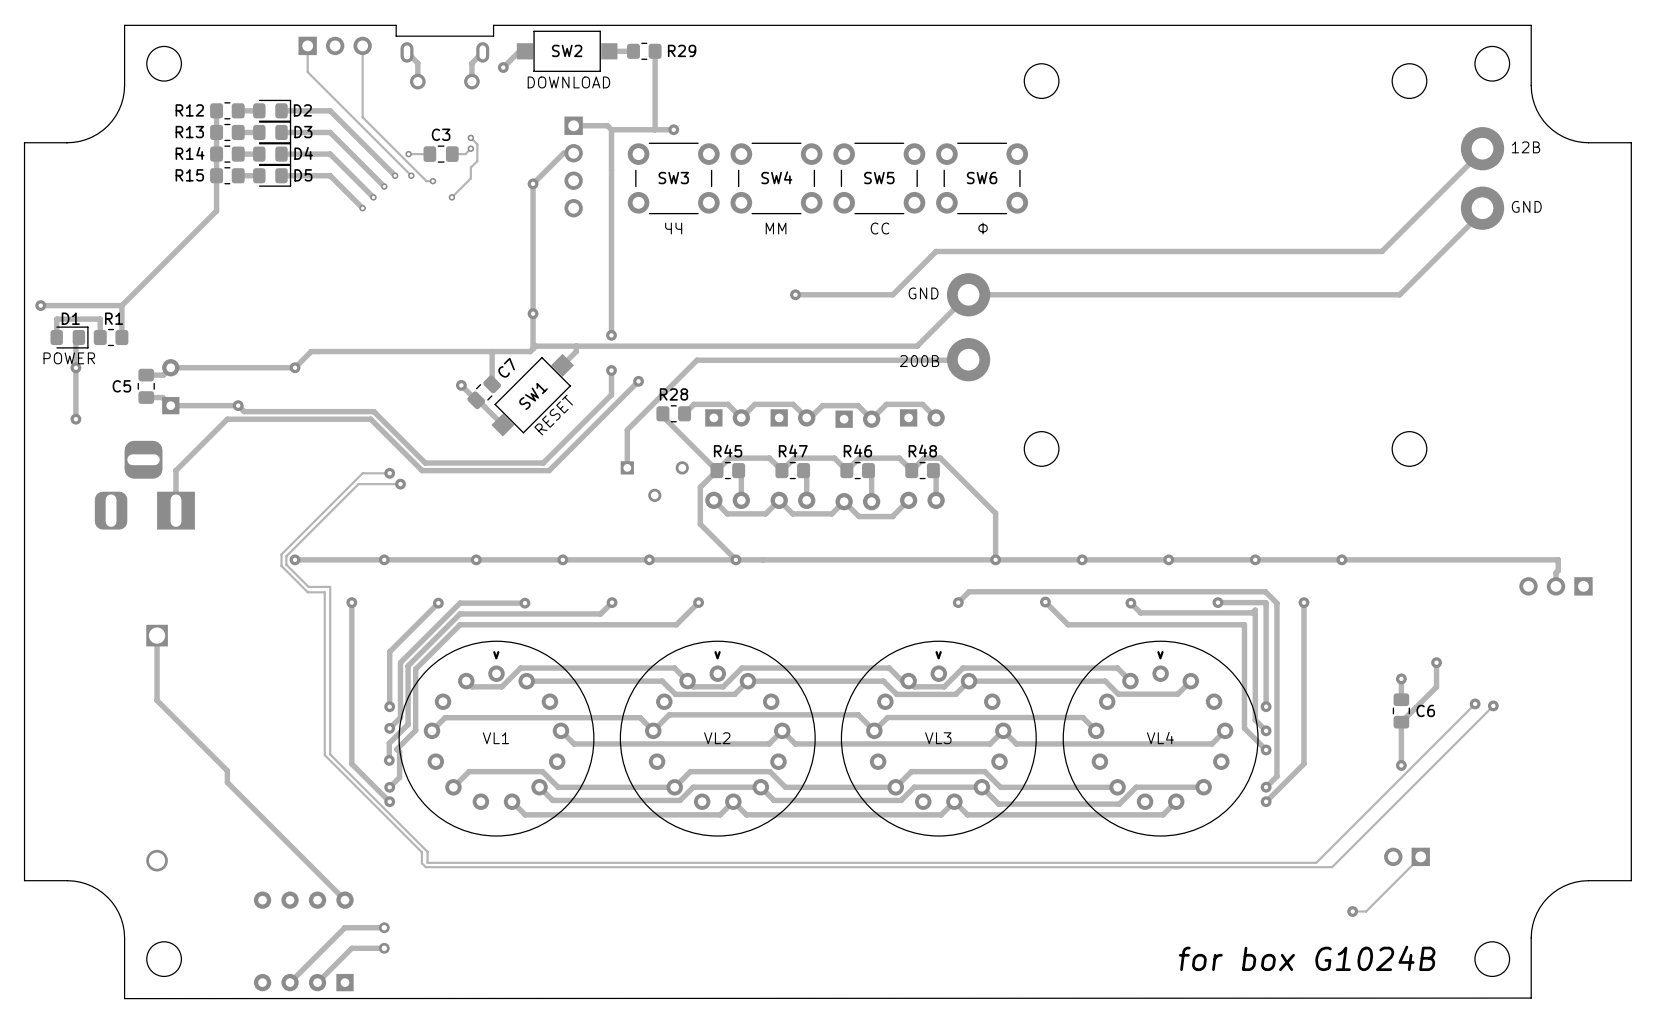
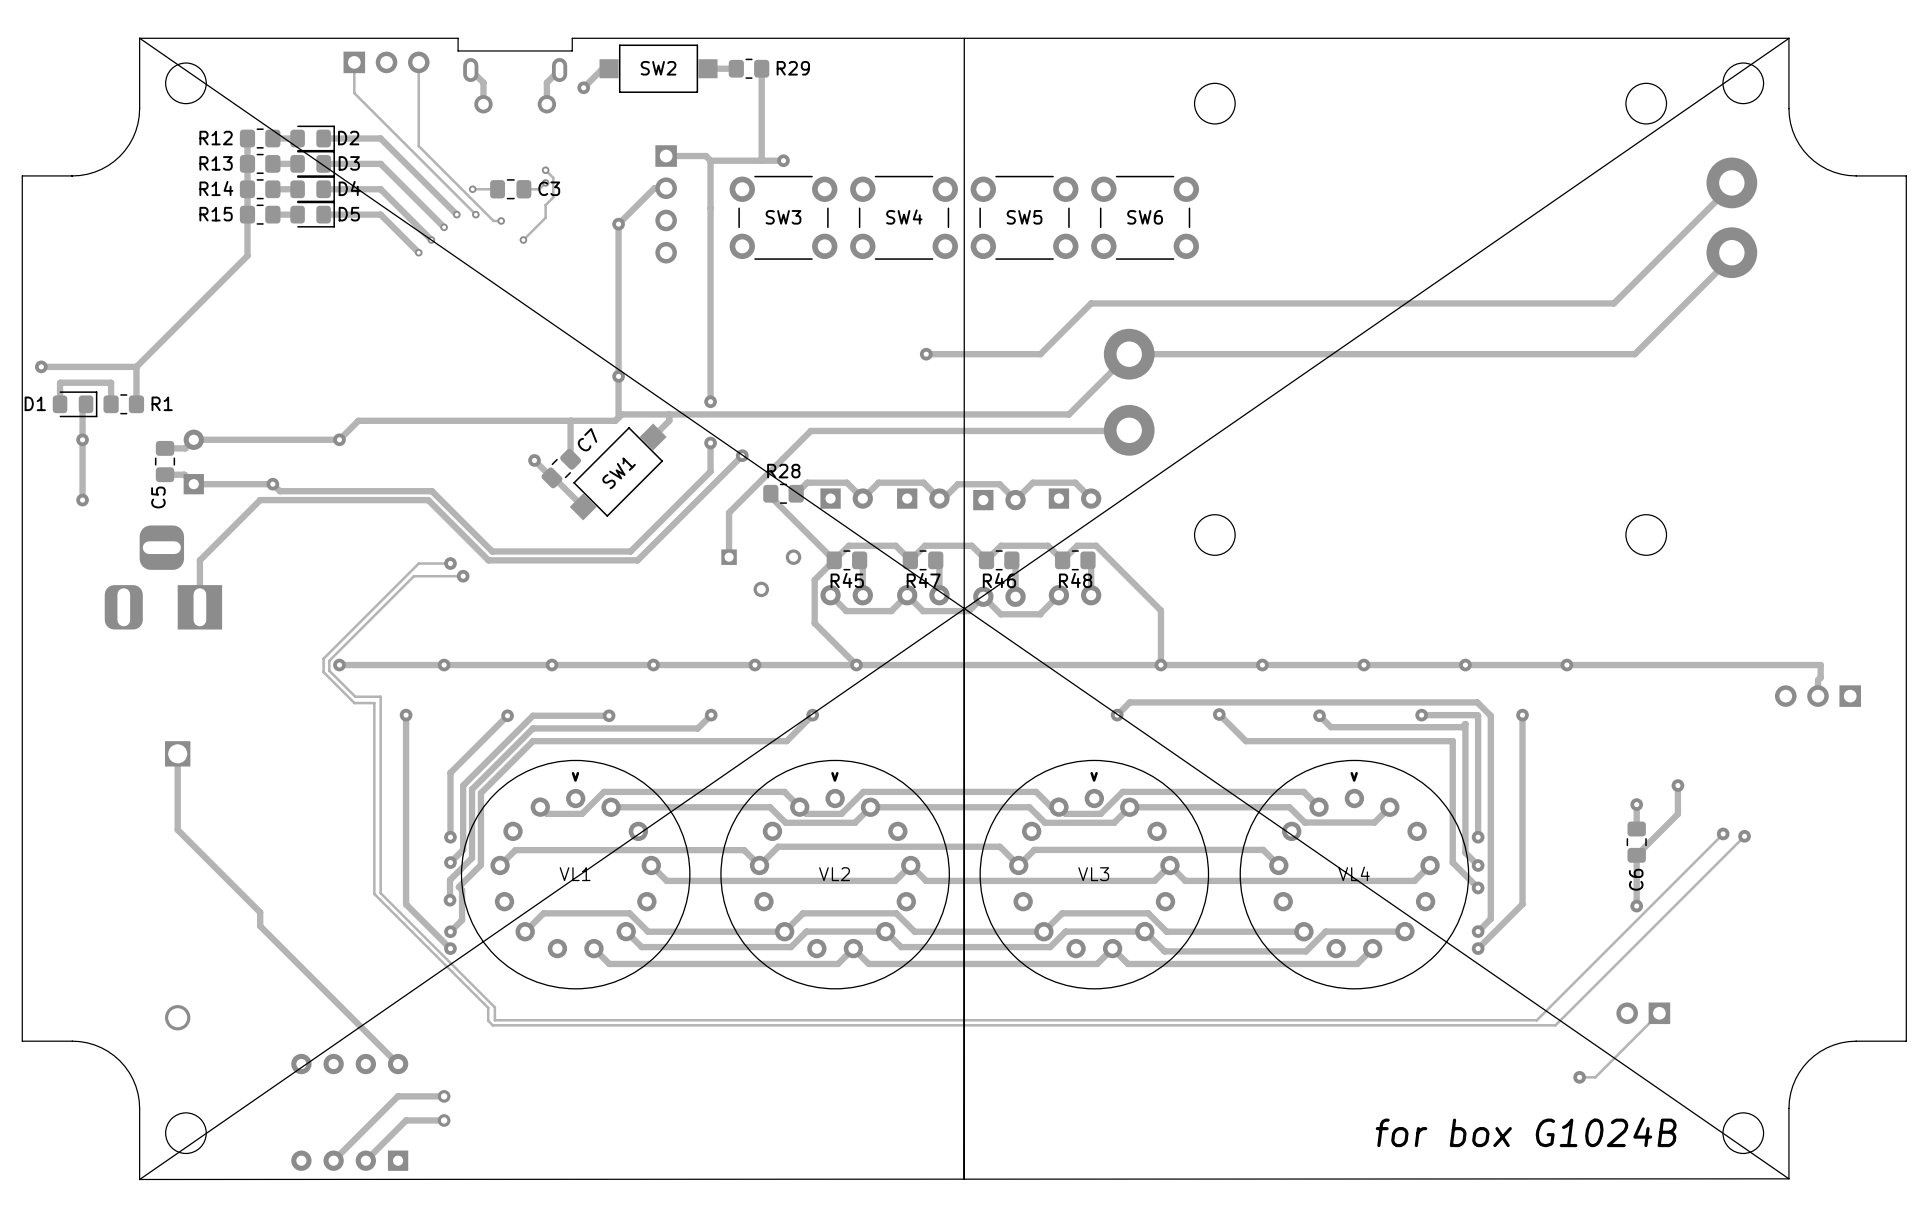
line: none -> (139, 38) (1788, 1178)
line: none -> (964, 38) (964, 1179) (964, 608)
line: none -> (1789, 38) (139, 1179)
text: DOWNLOAD (568, 82) -> none
C3 name position: C3 (441, 134) -> C3 (549, 188)
text: 12В (1526, 147) -> none
text: GND (1526, 206) -> none
text: ЧЧ (673, 228) -> none
text: ММ (776, 228) -> none
text: СС (880, 228) -> none
text: Ф (983, 228) -> none
text: GND (923, 293) -> none
D1 name position: D1 (70, 318) -> D1 (35, 403)
R1 name position: R1 (114, 318) -> R1 (162, 403)
text: POWER (69, 358) -> none
text: 200В (919, 361) -> none
C5 name rotation: 0° (121, 386) -> 90° counterclockwise (158, 497)
C5 name position: C5 (121, 386) -> C5 (158, 497)
text: RESET (553, 415) -> none
R45 name position: R45 (728, 451) -> R45 (847, 580)
R47 name position: R47 (793, 451) -> R47 (923, 580)
R46 name position: R46 (857, 451) -> R46 (999, 580)
R48 name position: R48 (922, 451) -> R48 (1075, 580)
C6 name rotation: 0° (1425, 710) -> 90° counterclockwise (1636, 879)
C6 name position: C6 (1425, 710) -> C6 (1636, 879)

